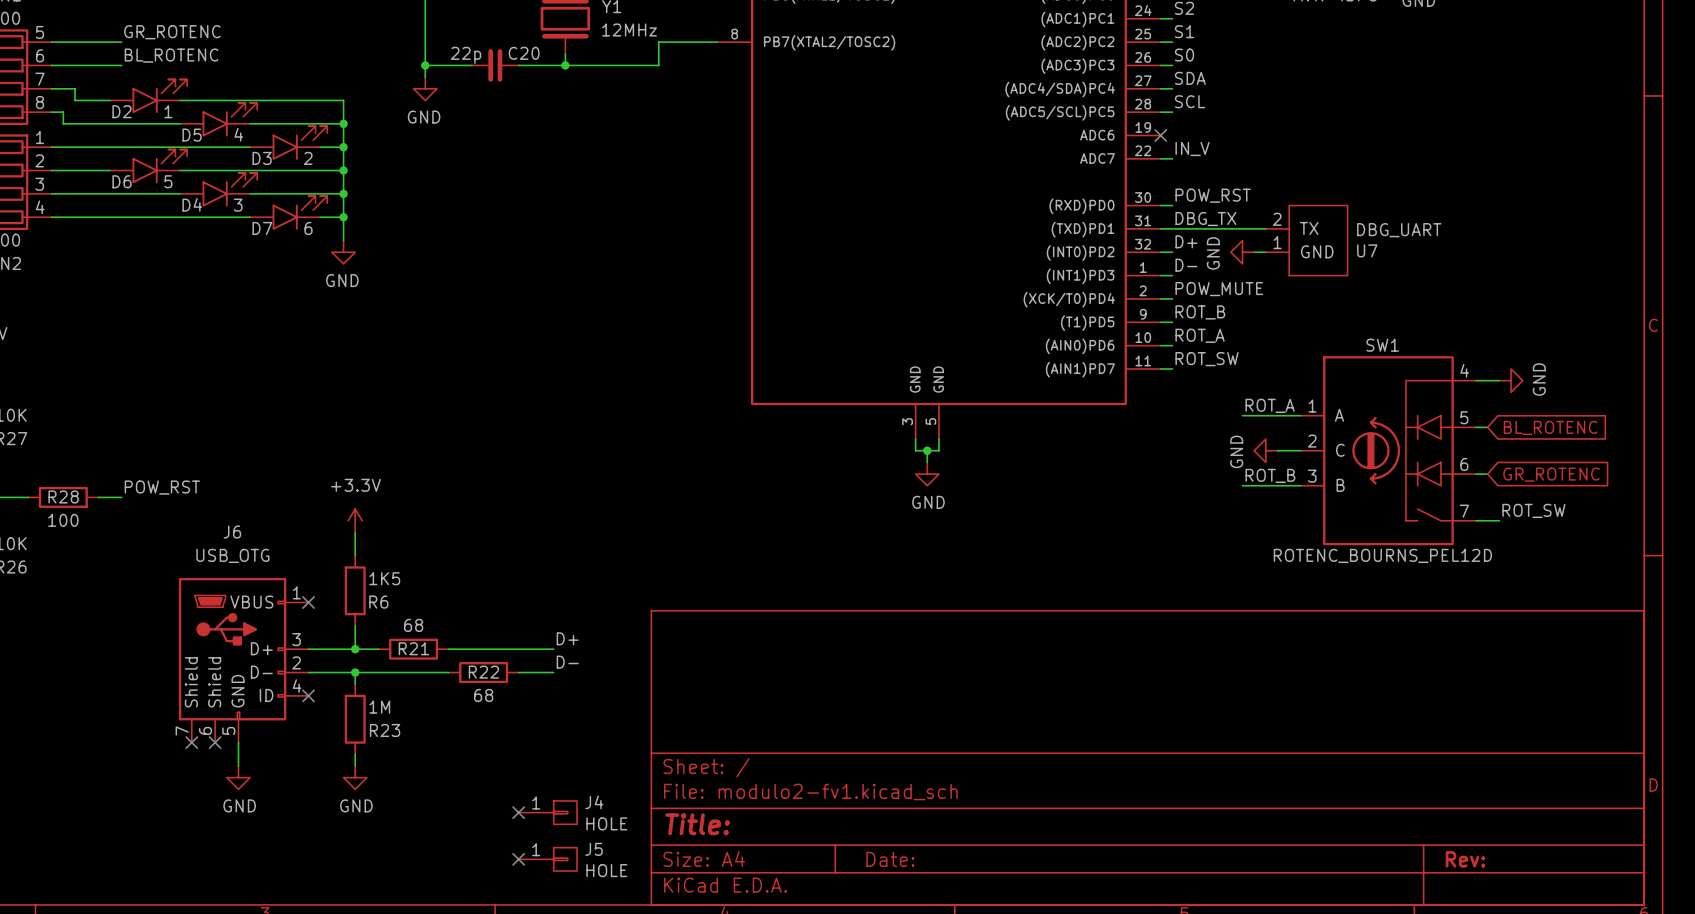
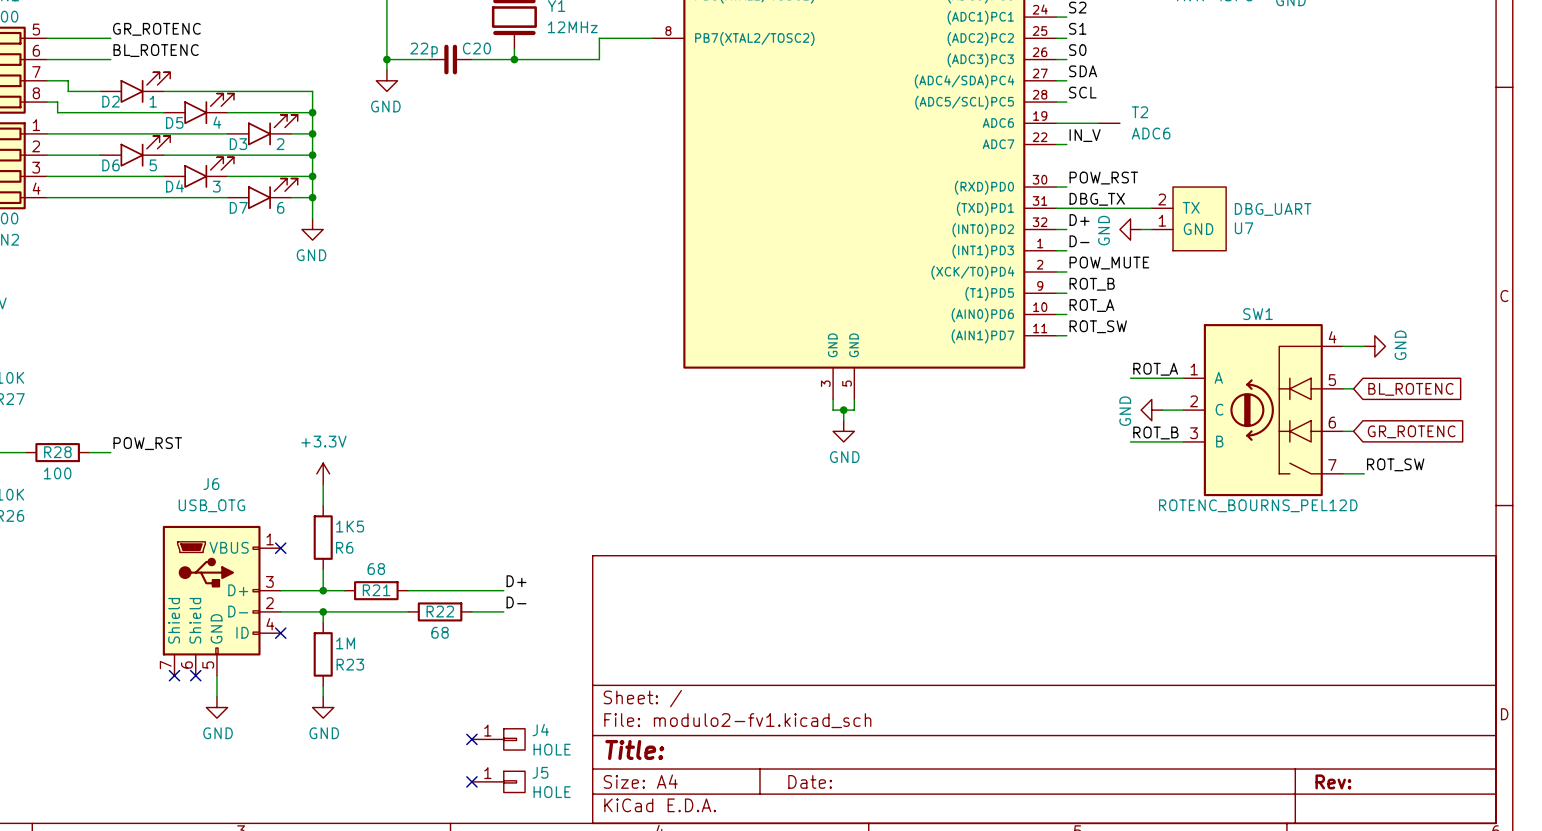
wire: none -> (1056, 123) (1098, 123)
no-connect mark: (1160, 135) -> none
T2: none -> ADC6 (1109, 123)

